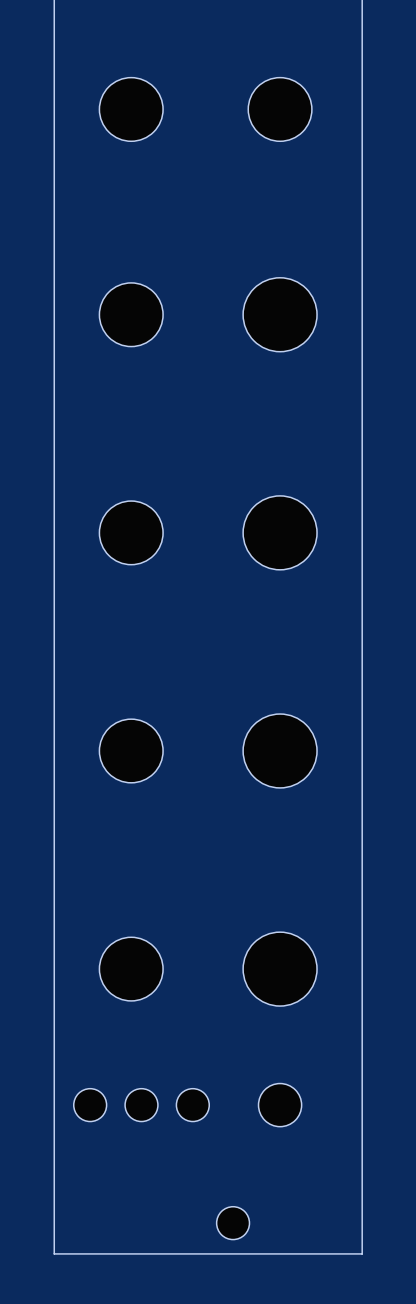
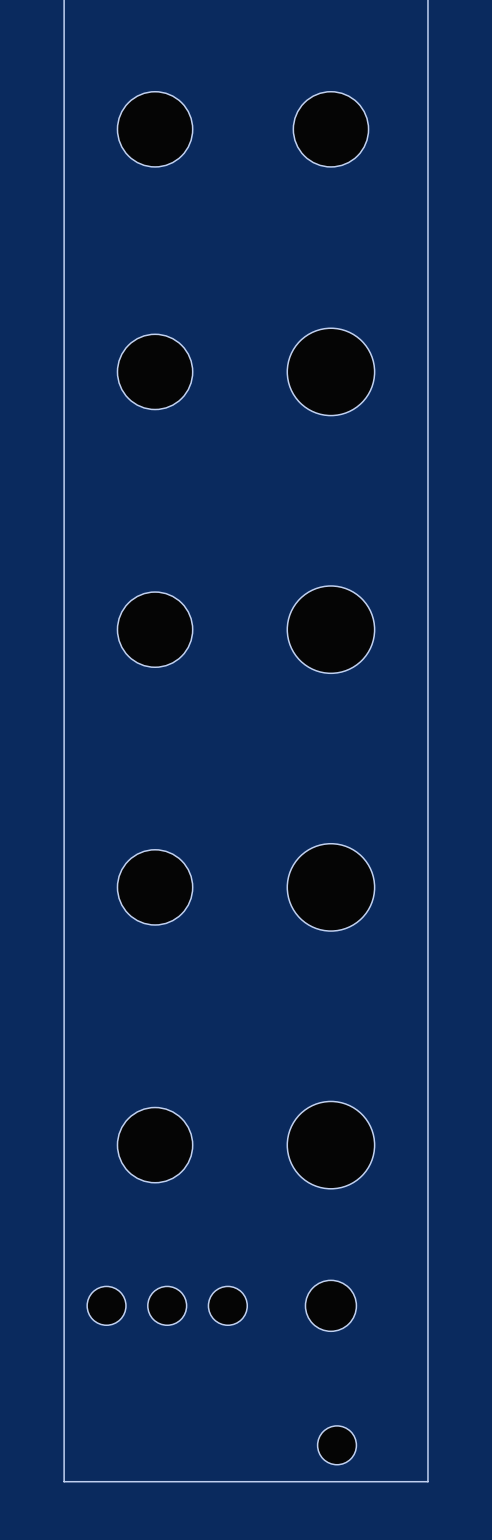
part position: (233, 1223) -> (337, 1445)

